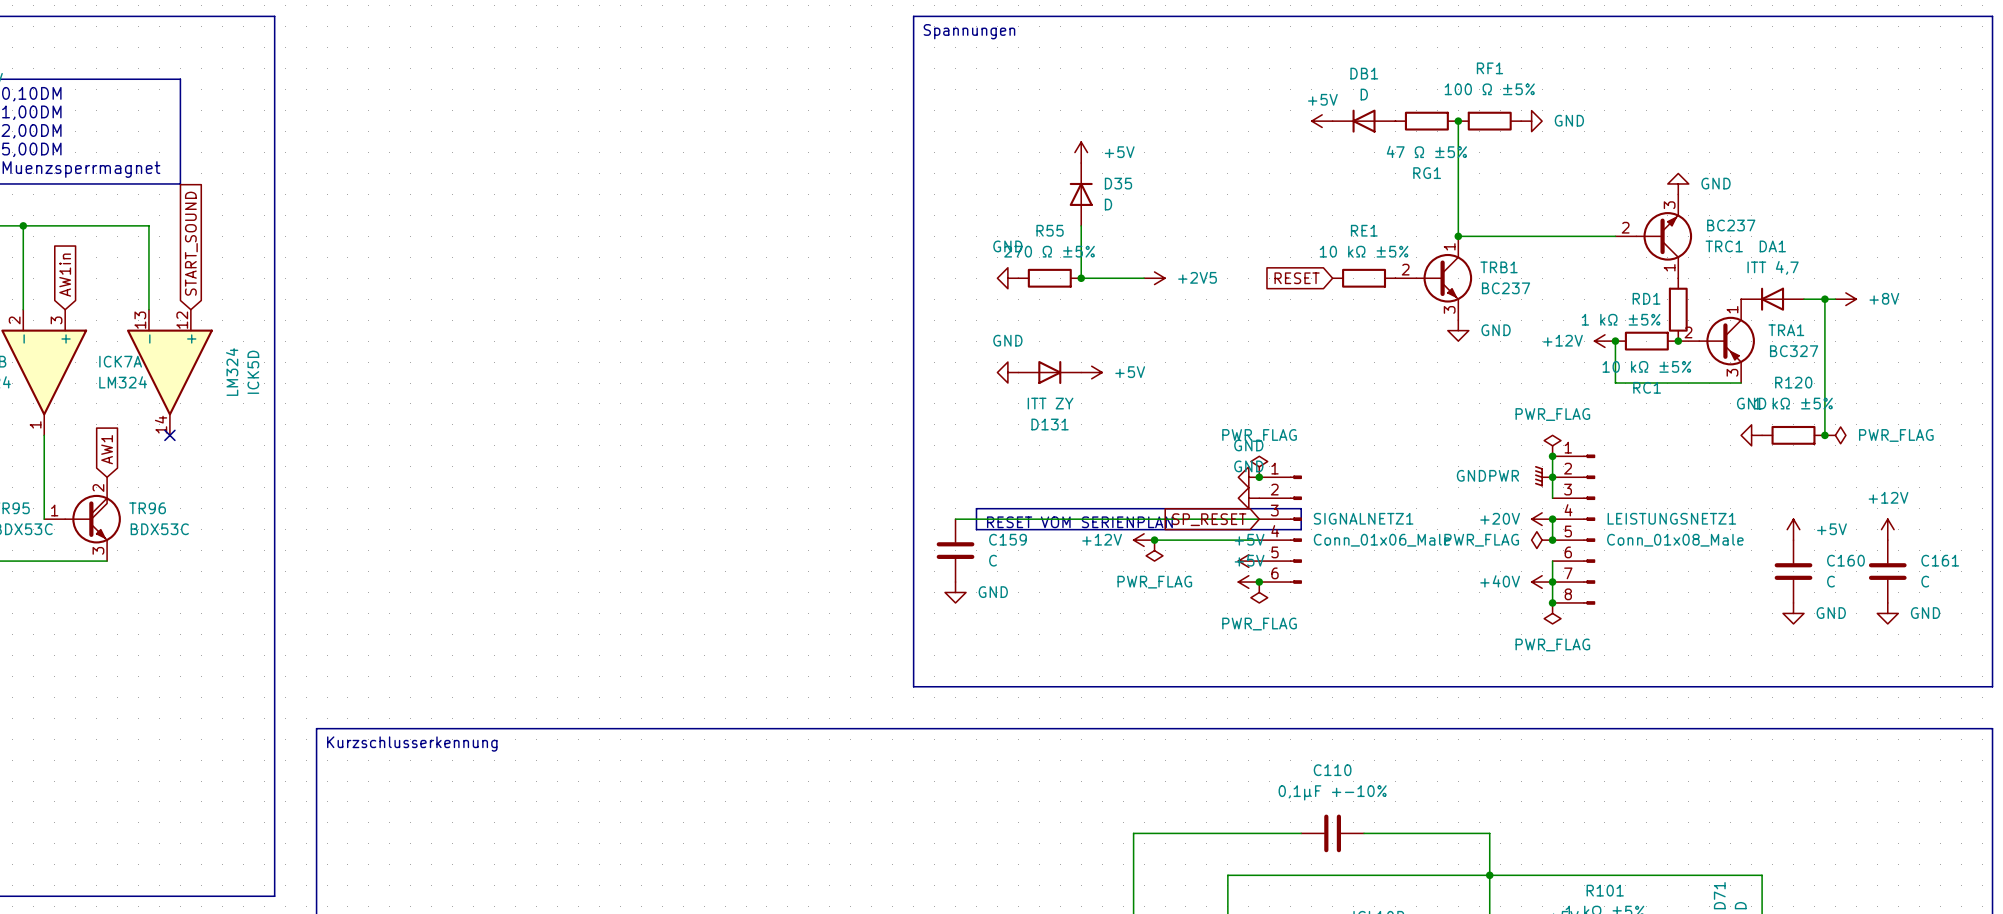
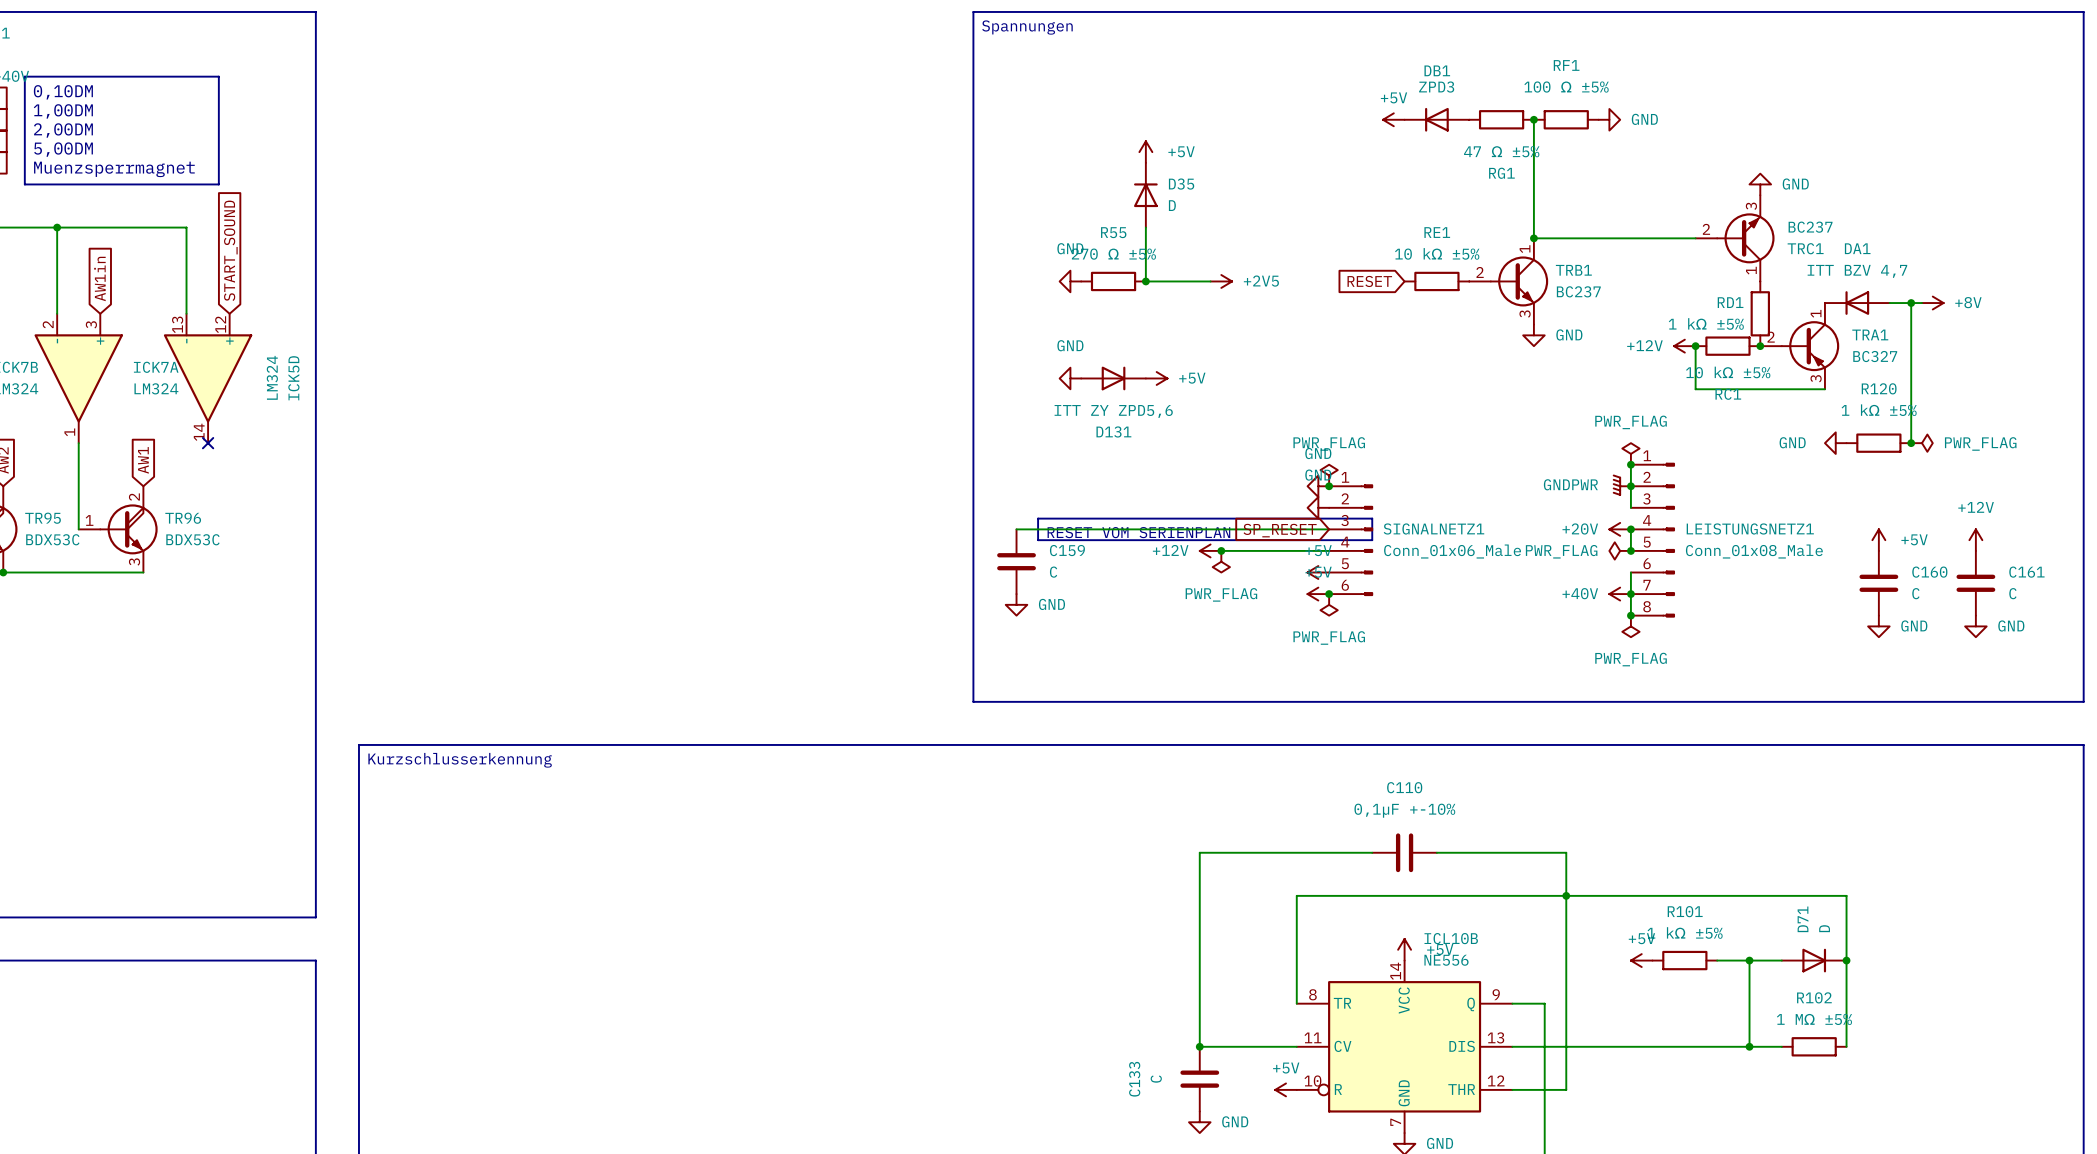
DB1 value: D (1364, 94) -> ZPD3 (1436, 87)
DA1 value: ITT 4,7 (1773, 267) -> ITT BZV 4,7 (1857, 271)
D131 value: ITT ZY (1050, 403) -> ITT ZY ZPD5,6 (1113, 411)
power symbol text position: GND (1751, 403) -> GND (1792, 442)

